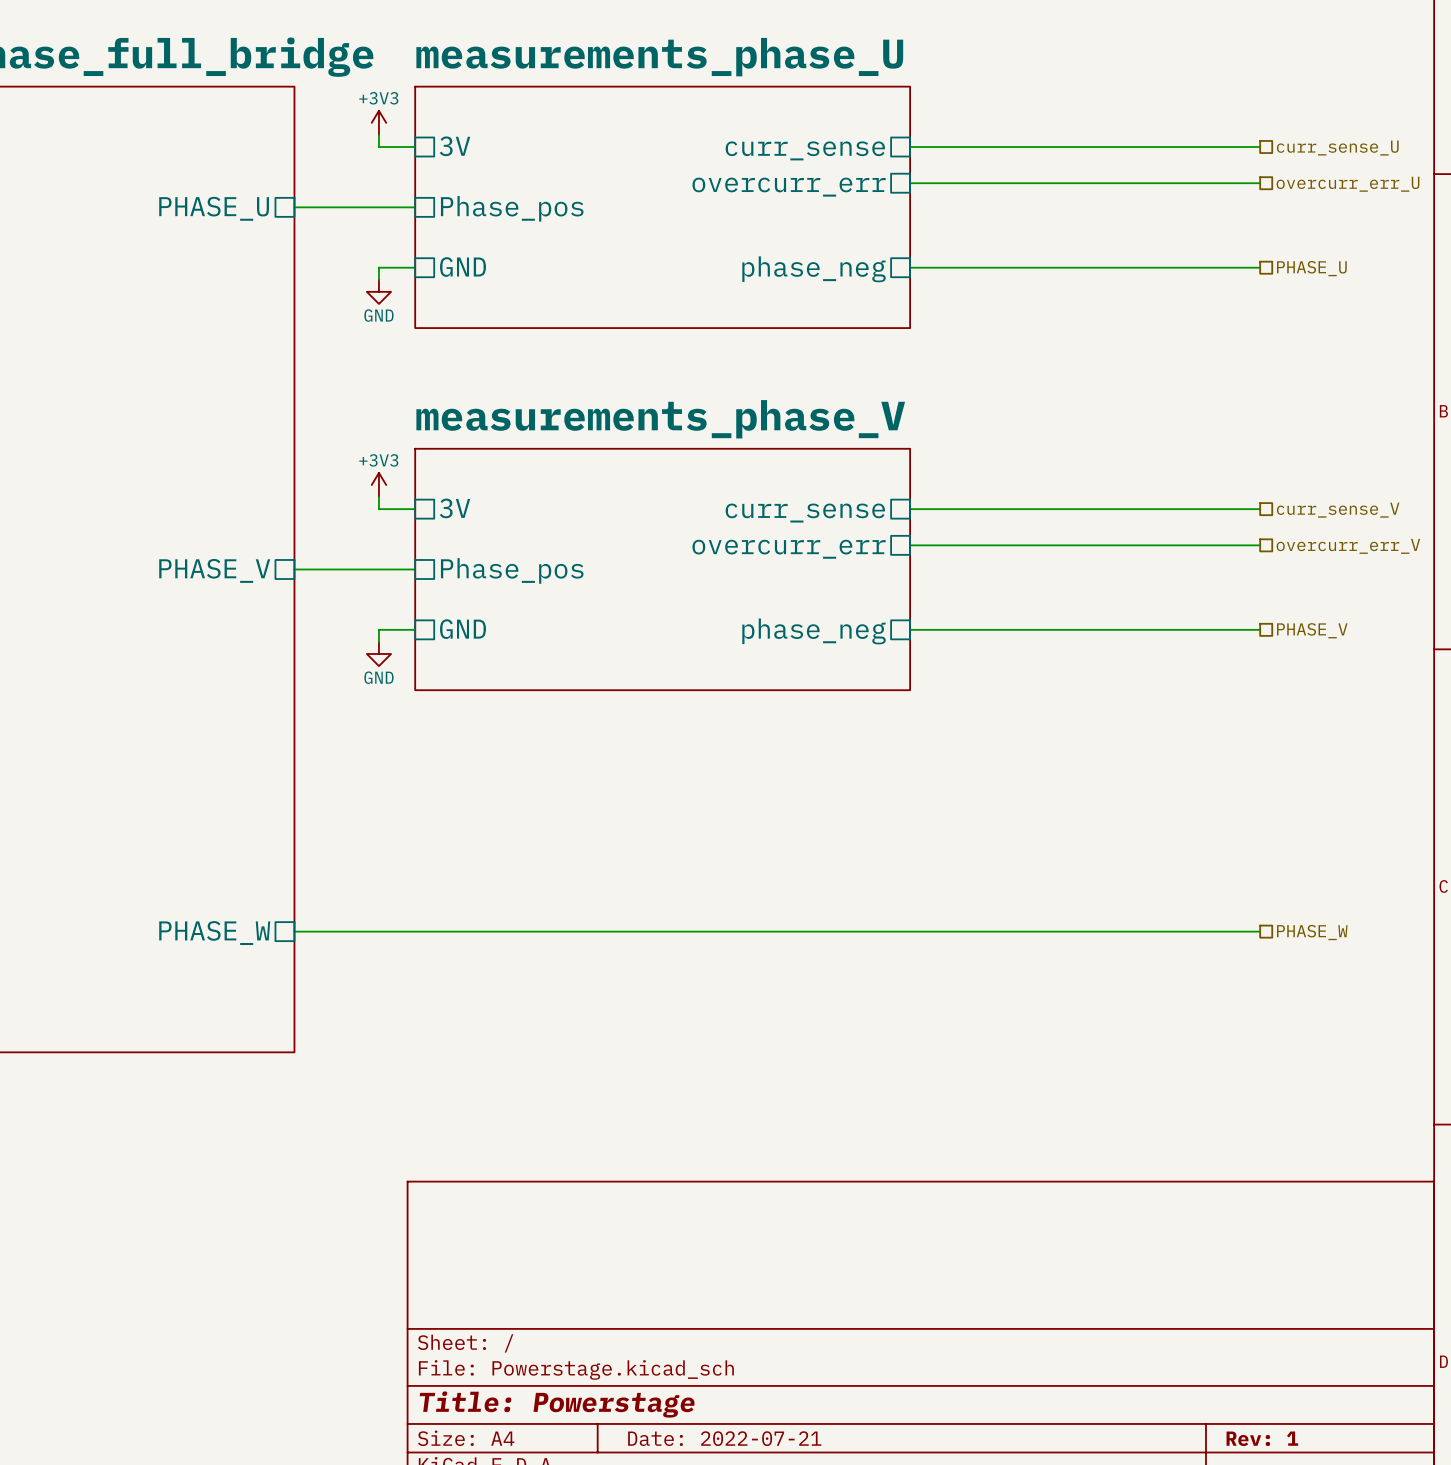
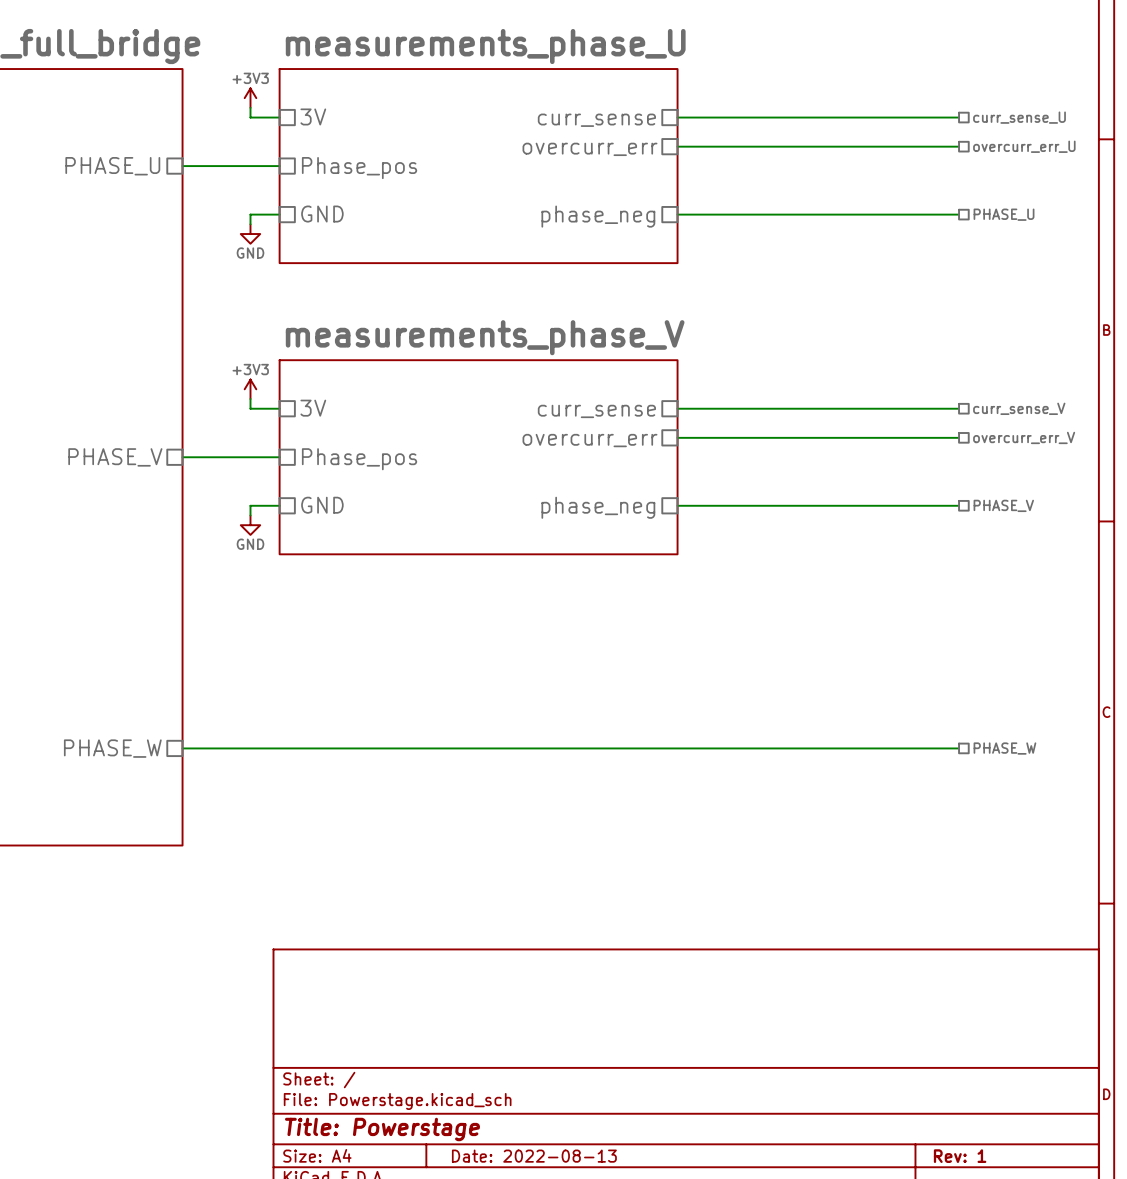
title block: Date: 2022-07-21 (724, 1438) -> Date: 2022-08-13 (534, 1156)

